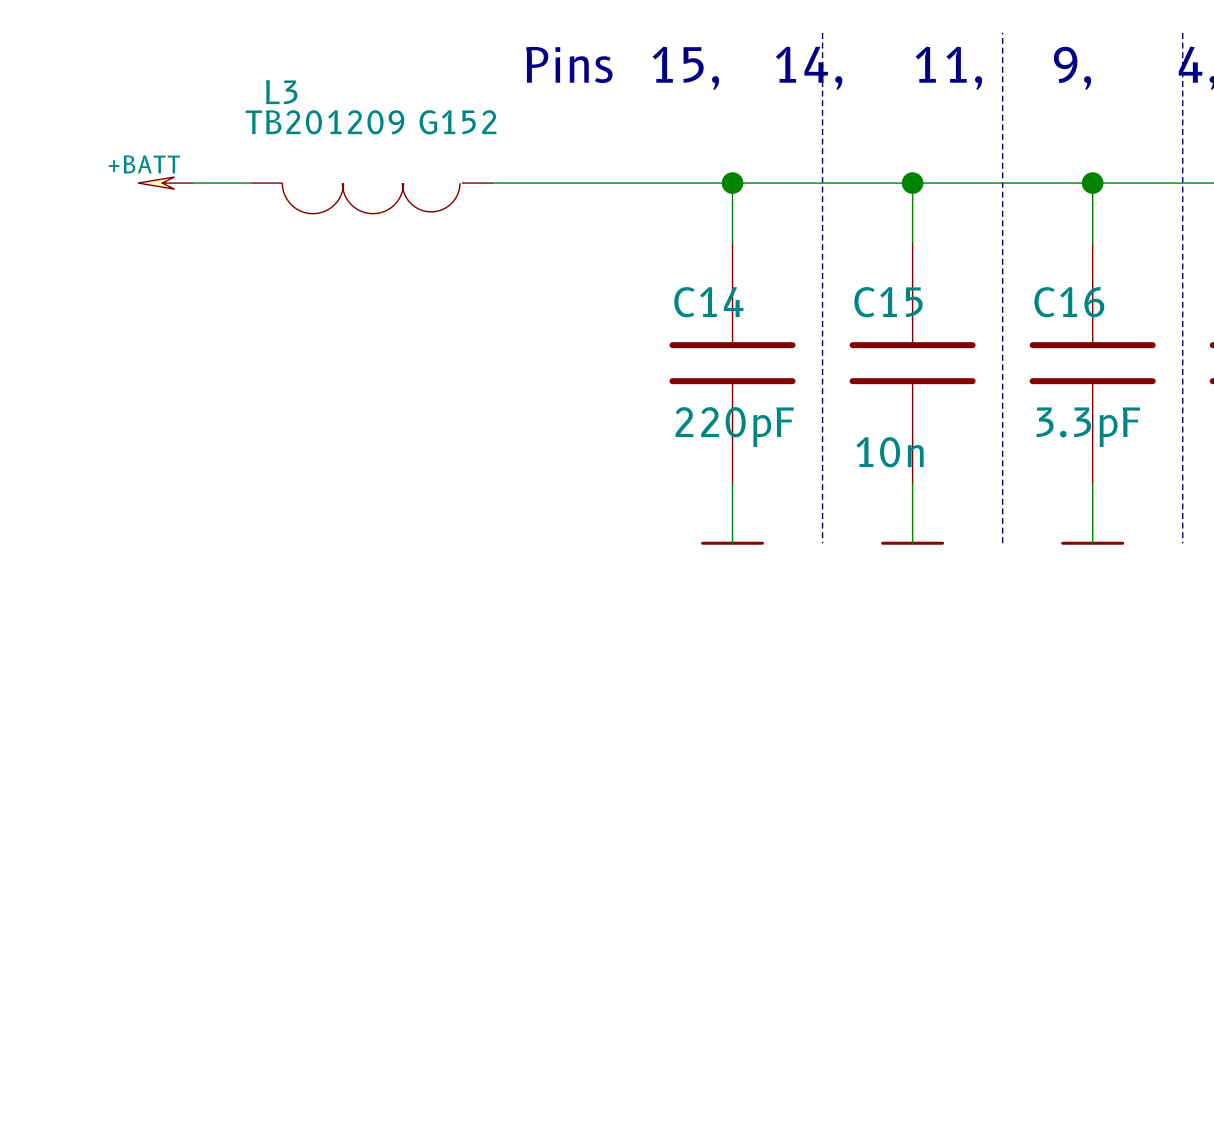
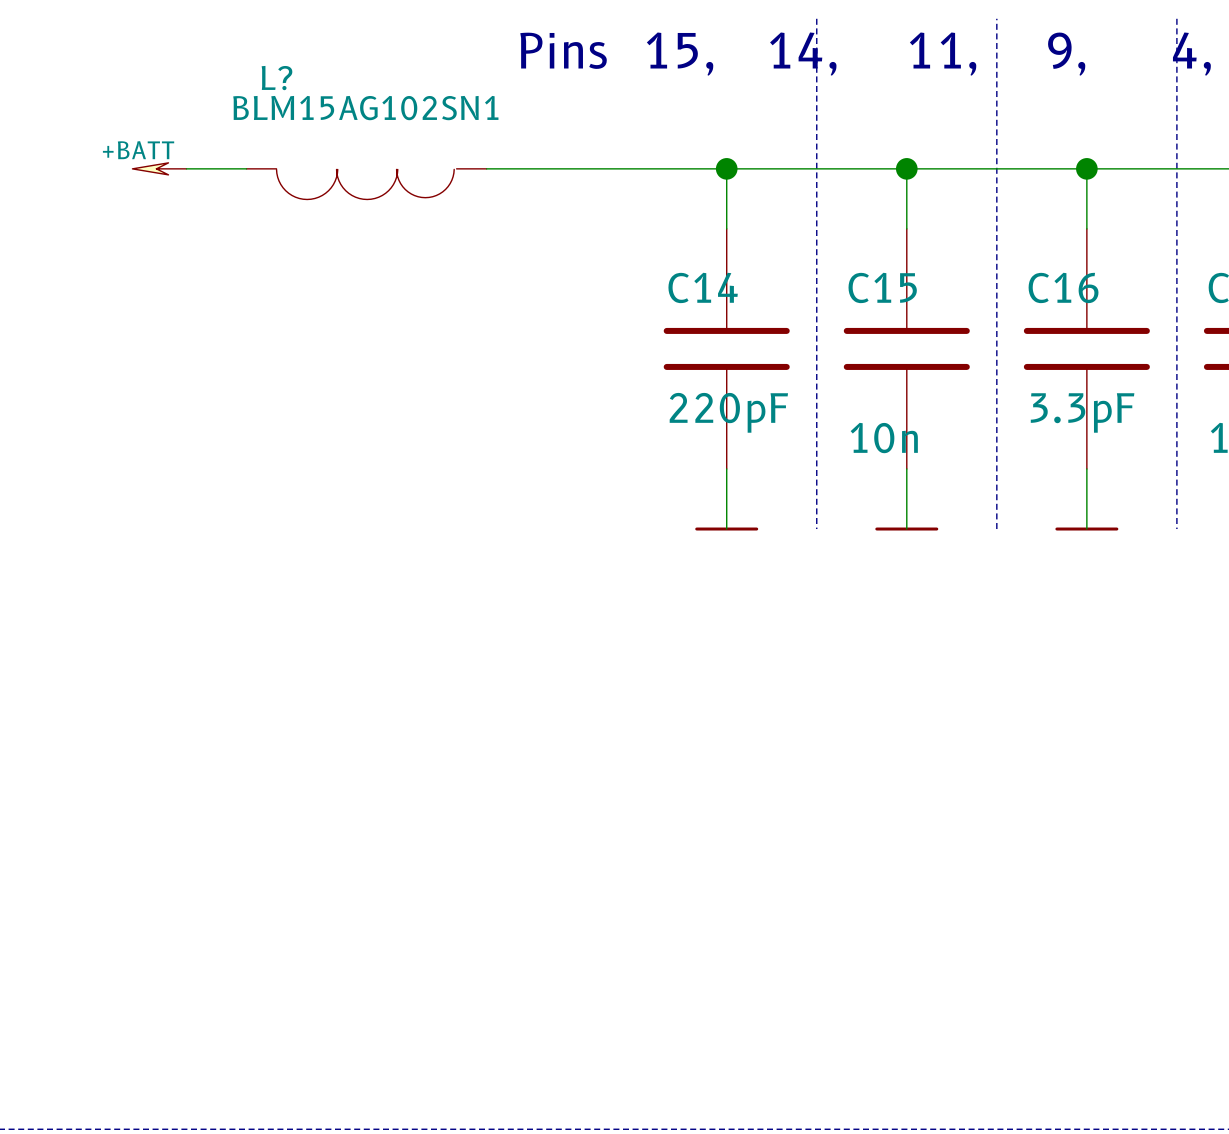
L3 name: L3 (281, 92) -> L? (277, 78)
L3 value: TB201209 G152 (371, 122) -> BLM15AG102SN1 (365, 108)

